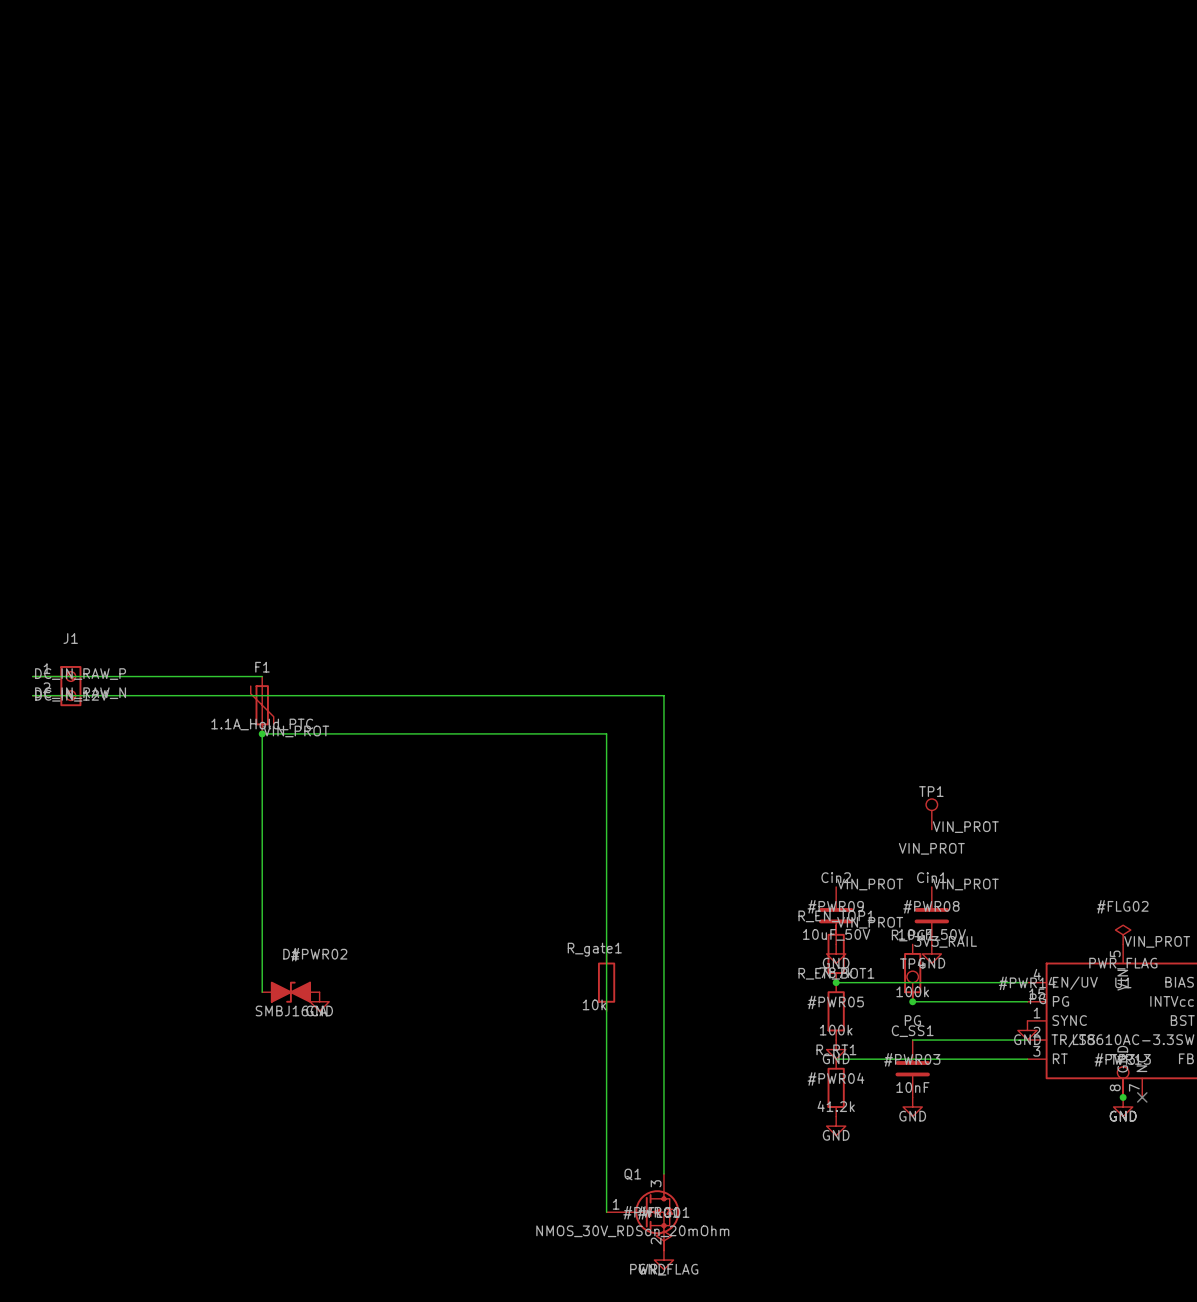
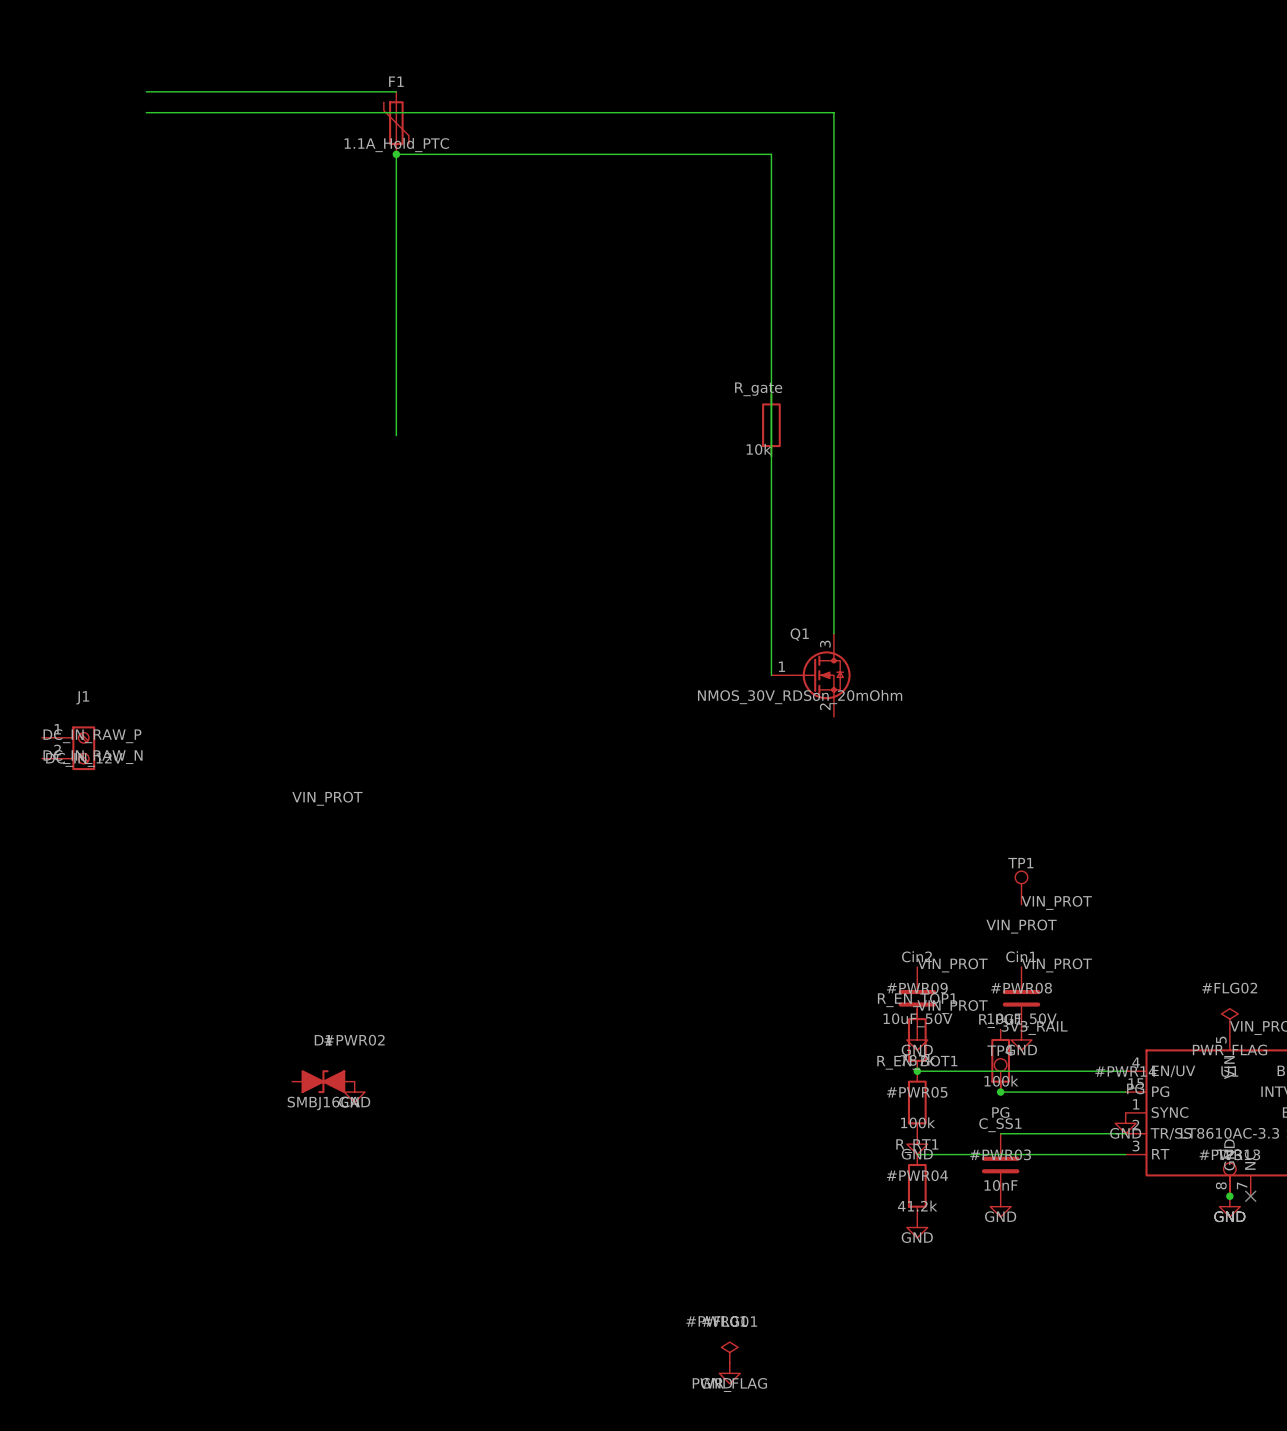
wire: none -> (146, 91) (396, 91)
wire: none -> (146, 112) (833, 112) (833, 633)
junction: none -> (396, 154)
R_gate: none -> 10k (771, 425)
wire: none -> (396, 435) (396, 154) (771, 154) (771, 675)
wire: (32, 676) (262, 676) -> none
wire: (32, 695) (663, 695) (663, 1173) -> none
F1 position: (262, 705) -> (396, 123)
junction: (262, 733) -> none
R_gate1: 10k (606, 982) -> none
wire: (262, 992) (262, 733) (606, 733) (606, 1212) -> none
Q1 position: (642, 1212) -> (811, 675)

